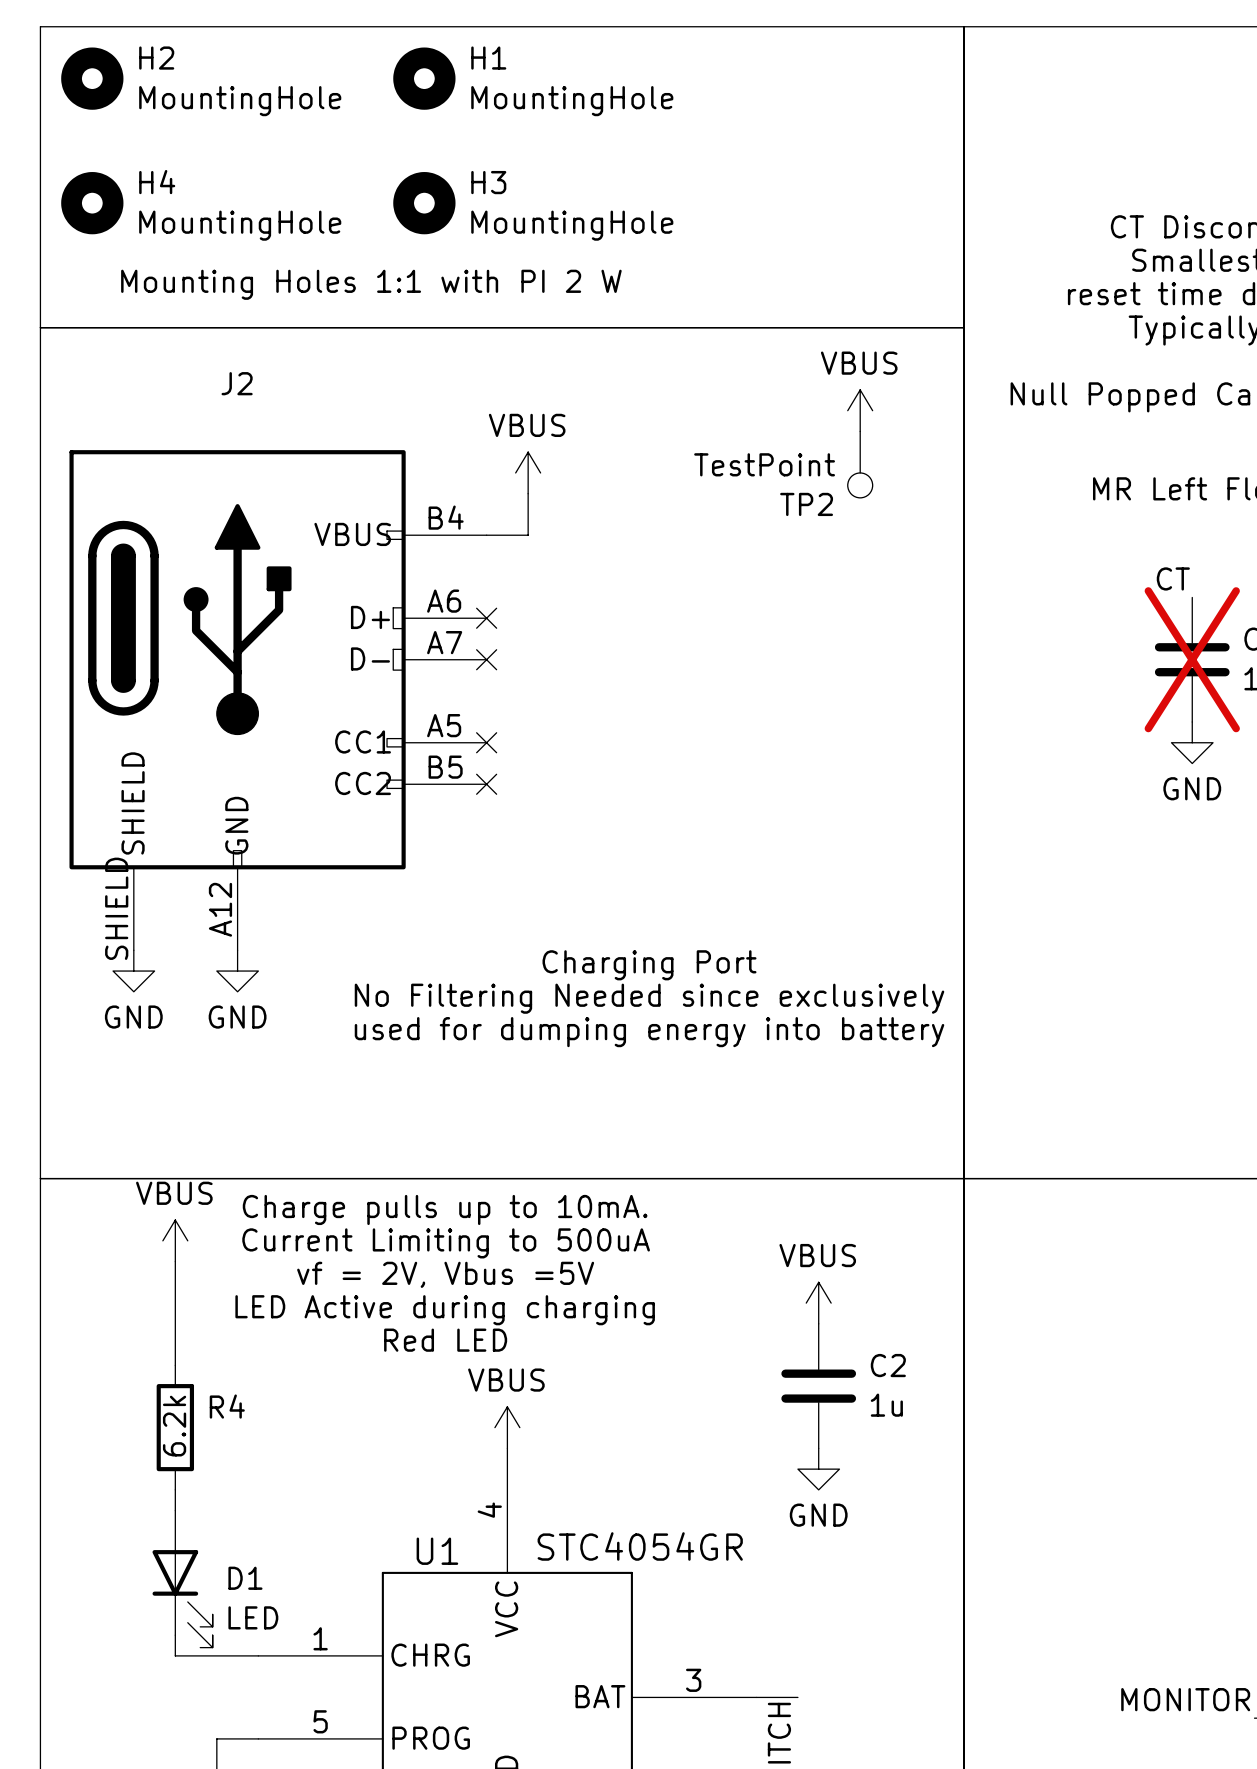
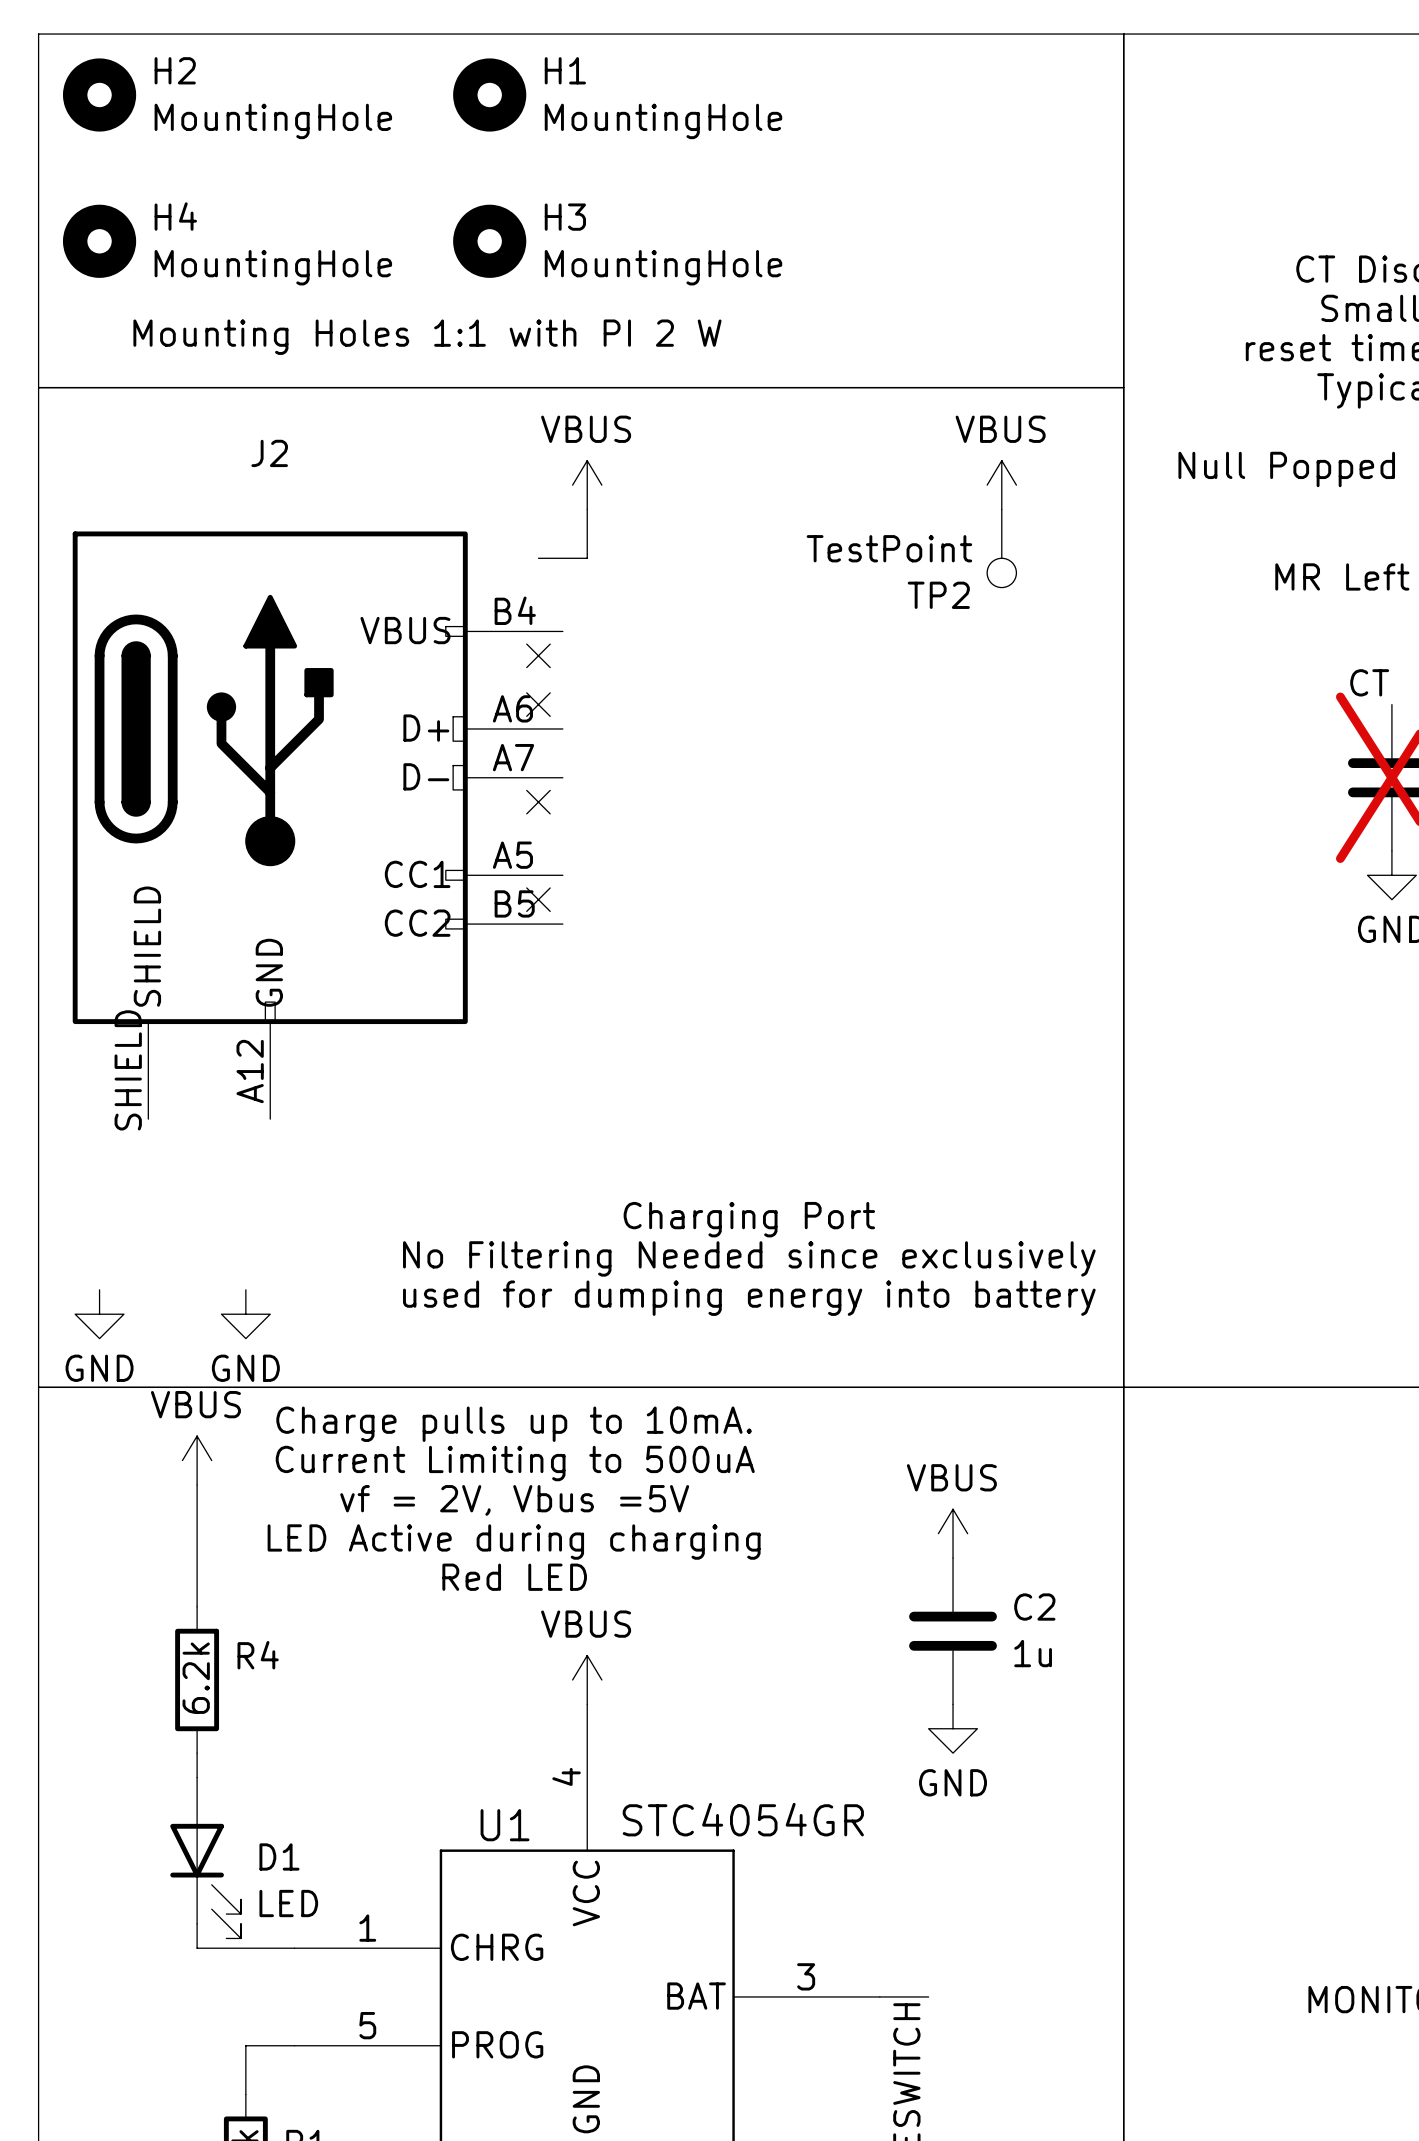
power symbol position: VBUS (528, 472) -> VBUS (587, 485)
wire: (528, 493) (528, 535) (486, 535) -> (587, 509) (587, 558) (538, 558)
no-connect mark: none -> (538, 655)
no-connect mark position: (486, 618) -> (538, 704)
no-connect mark position: (486, 659) -> (538, 802)
no-connect mark: (486, 742) -> none
no-connect mark: none -> (538, 899)
no-connect mark: (486, 784) -> none
text position: Charging Port (649, 965) -> Charging Port (749, 1219)
power symbol: GND (133, 971) -> none
power symbol: GND (237, 971) -> none
text position: No Filtering Needed since exclusively (649, 998) -> No Filtering Needed since exclusively (749, 1258)
text position: used for dumping energy into battery (649, 1032) -> used for dumping energy into battery (749, 1298)
power symbol: none -> GND (99, 1314)
power symbol: none -> GND (245, 1314)

